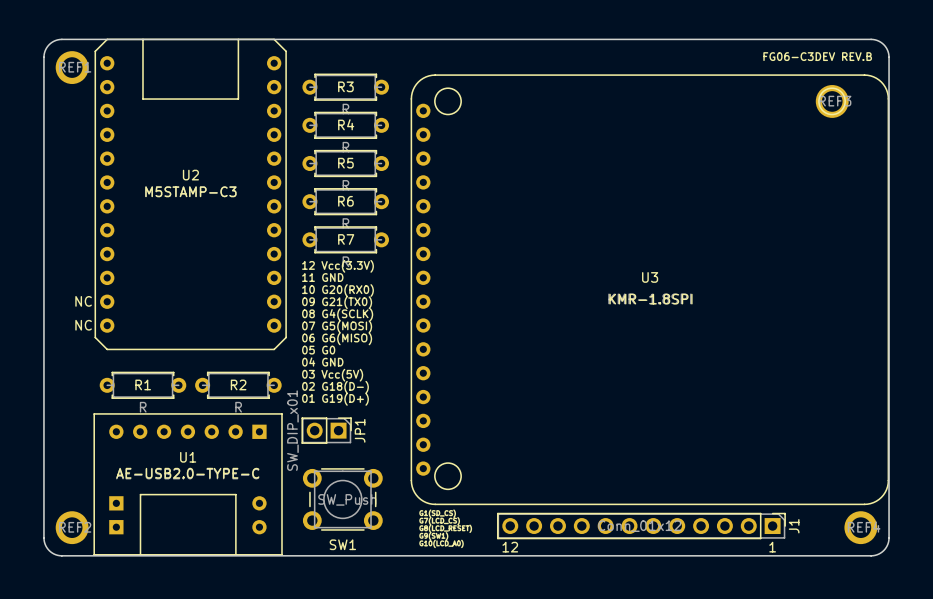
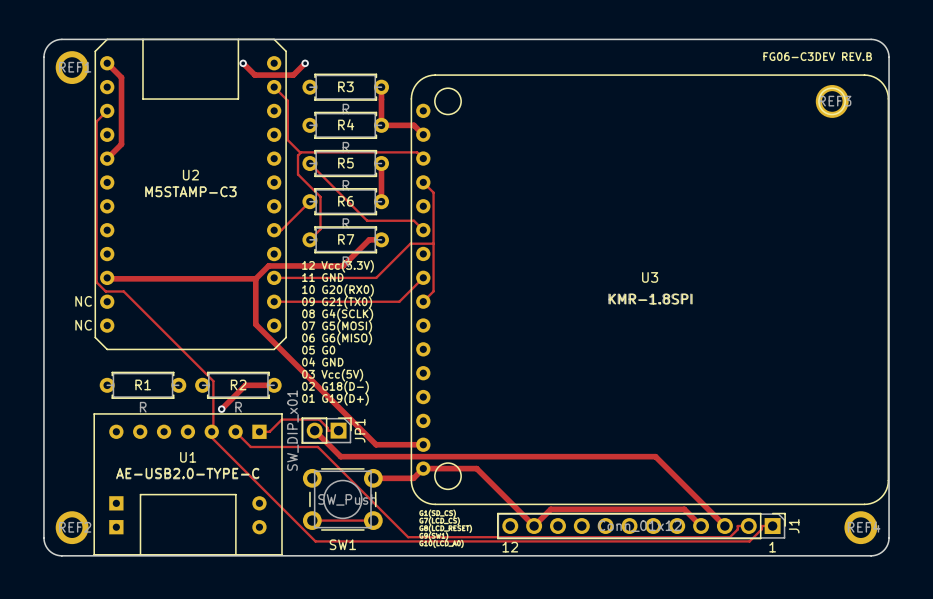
track: none -> (107, 63) (121, 77) (121, 144) (107, 158)
track: none -> (243, 63) (254, 75) (293, 75) (305, 63)
via: none -> (243, 63)
via: none -> (305, 63)
track: none -> (274, 87) (287, 100) (287, 140) (300, 152) (417, 152) (423, 158)
track: none -> (381, 87) (381, 125) (413, 125) (423, 134)
track: none -> (107, 110) (96, 121) (96, 282) (105, 291) (123, 291) (213, 381) (211, 437) (315, 541) (749, 541) (761, 529) (761, 526) (772, 526)
track: none -> (301, 152) (298, 155) (298, 174) (320, 196) (320, 229) (309, 239)
track: none -> (309, 163) (367, 220) (413, 220) (423, 230)
track: none -> (381, 163) (381, 201)
track: none -> (423, 182) (433, 192) (433, 291) (423, 301)
track: none -> (309, 201) (281, 230) (274, 230)
track: none -> (381, 239) (369, 239) (343, 265) (268, 265) (255, 278)
track: none -> (433, 243) (410, 243) (376, 277) (274, 277)
track: none -> (107, 277) (255, 278)
track: none -> (423, 277) (399, 301) (274, 301)
track: none -> (255, 278) (255, 324) (376, 444) (423, 444)
track: none -> (274, 385) (245, 385) (221, 409)
via: none -> (221, 409)
track: none -> (314, 430) (340, 456) (655, 456) (724, 526)
track: none -> (338, 430) (327, 430) (327, 427) (319, 419) (281, 419) (269, 431) (259, 431)
track: none -> (235, 431) (250, 446) (317, 446) (408, 537) (730, 537) (737, 529) (737, 526) (748, 526)
track: none -> (373, 478) (413, 478) (423, 468) (476, 468) (534, 526) (550, 509) (684, 509) (701, 526)
track: none -> (312, 520) (373, 520)

